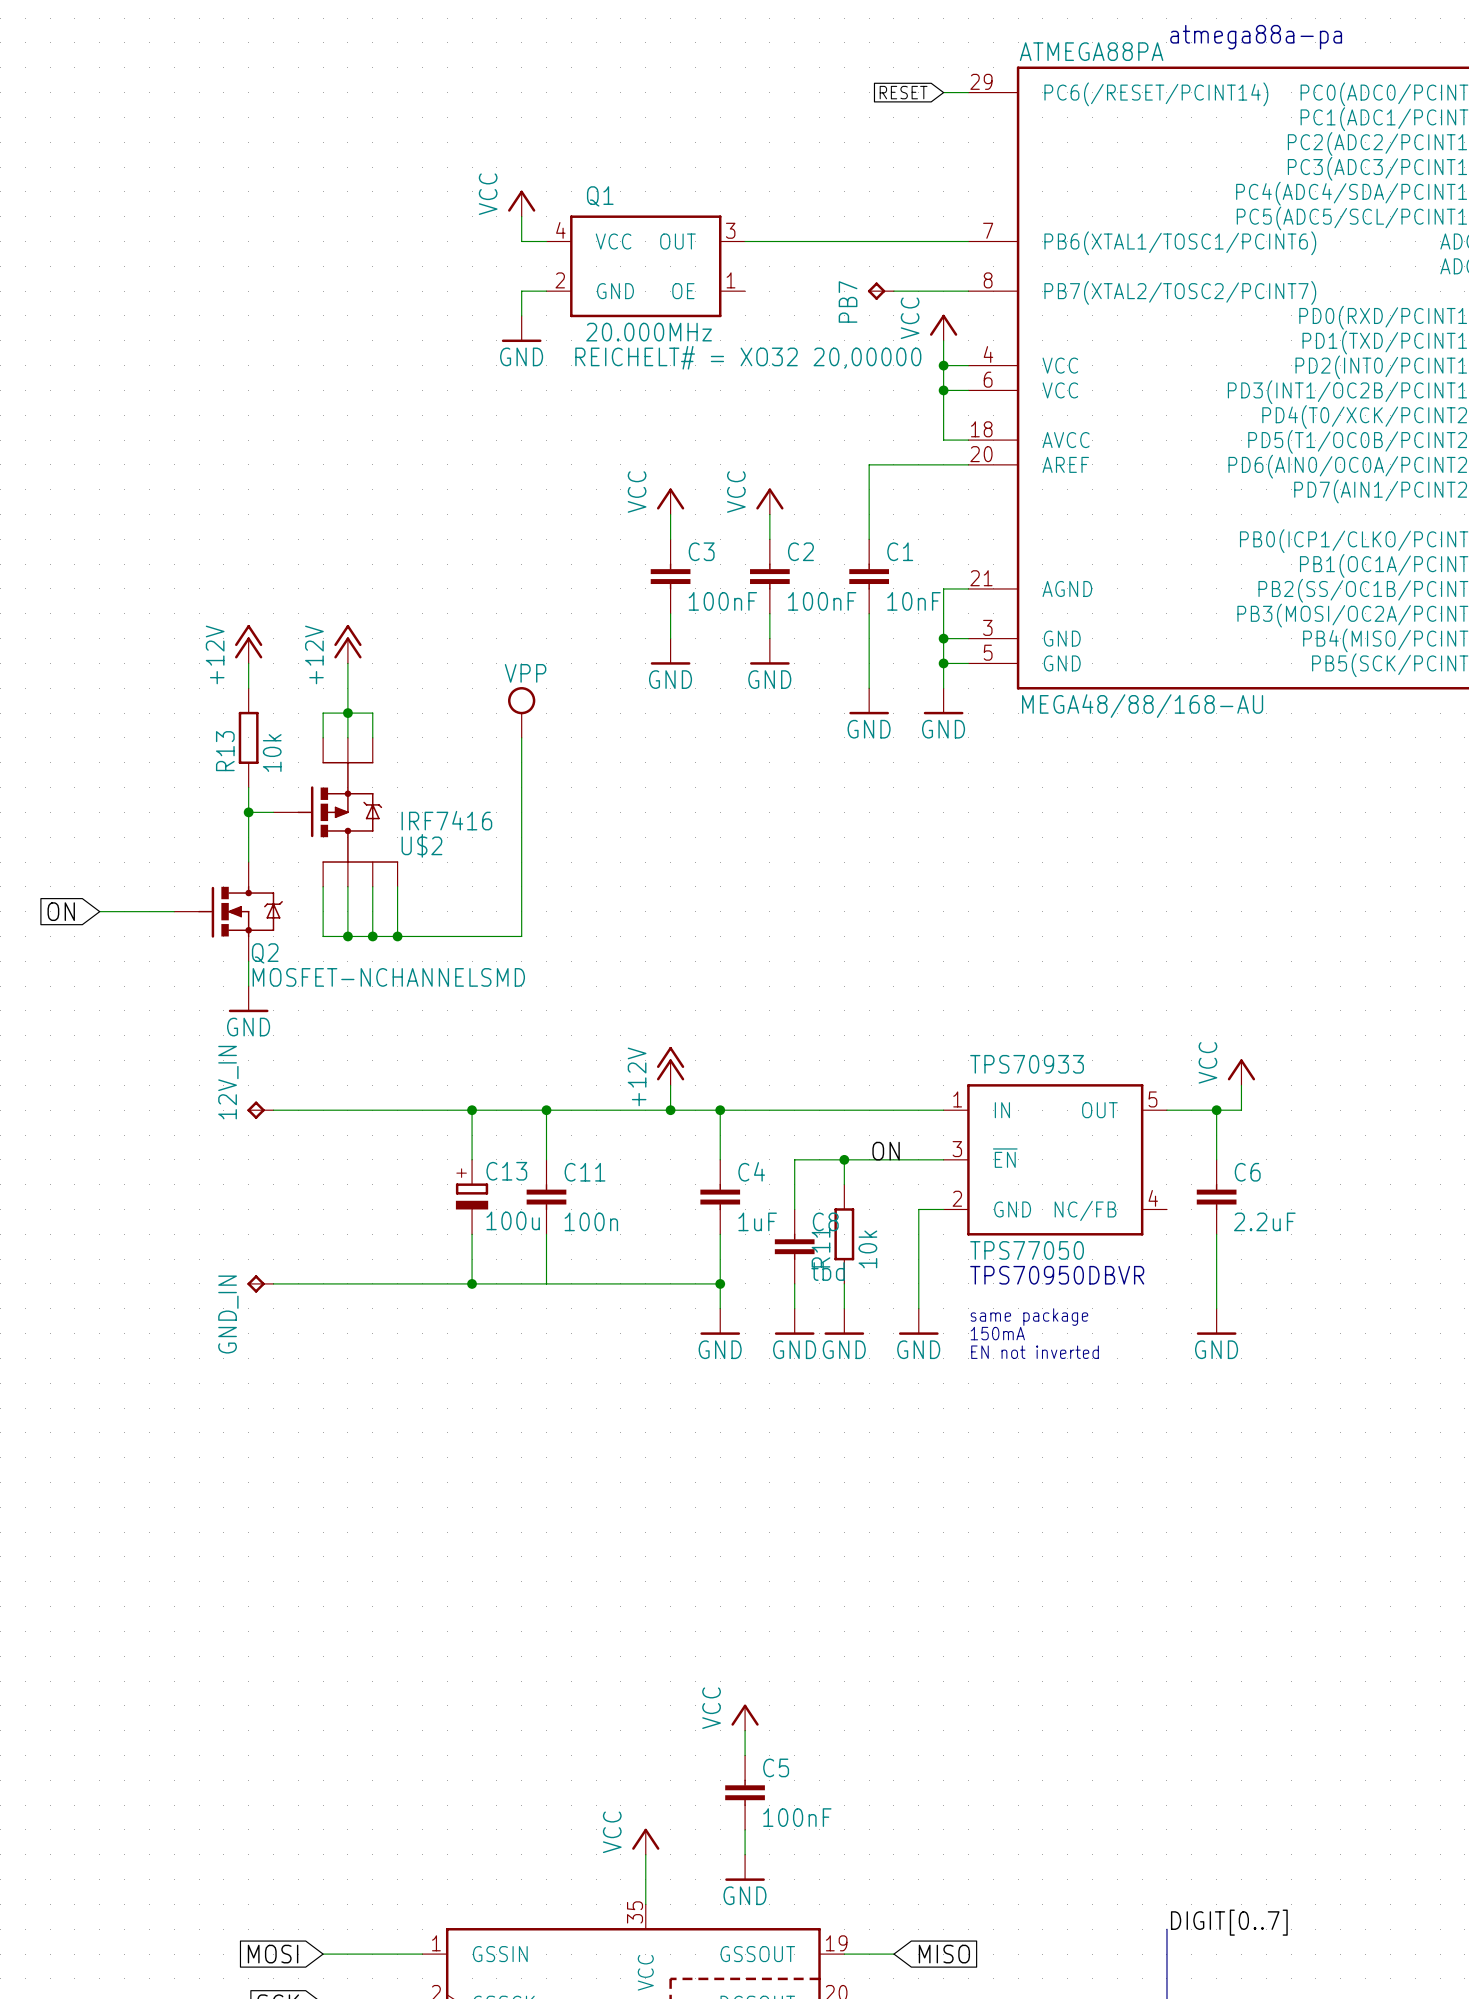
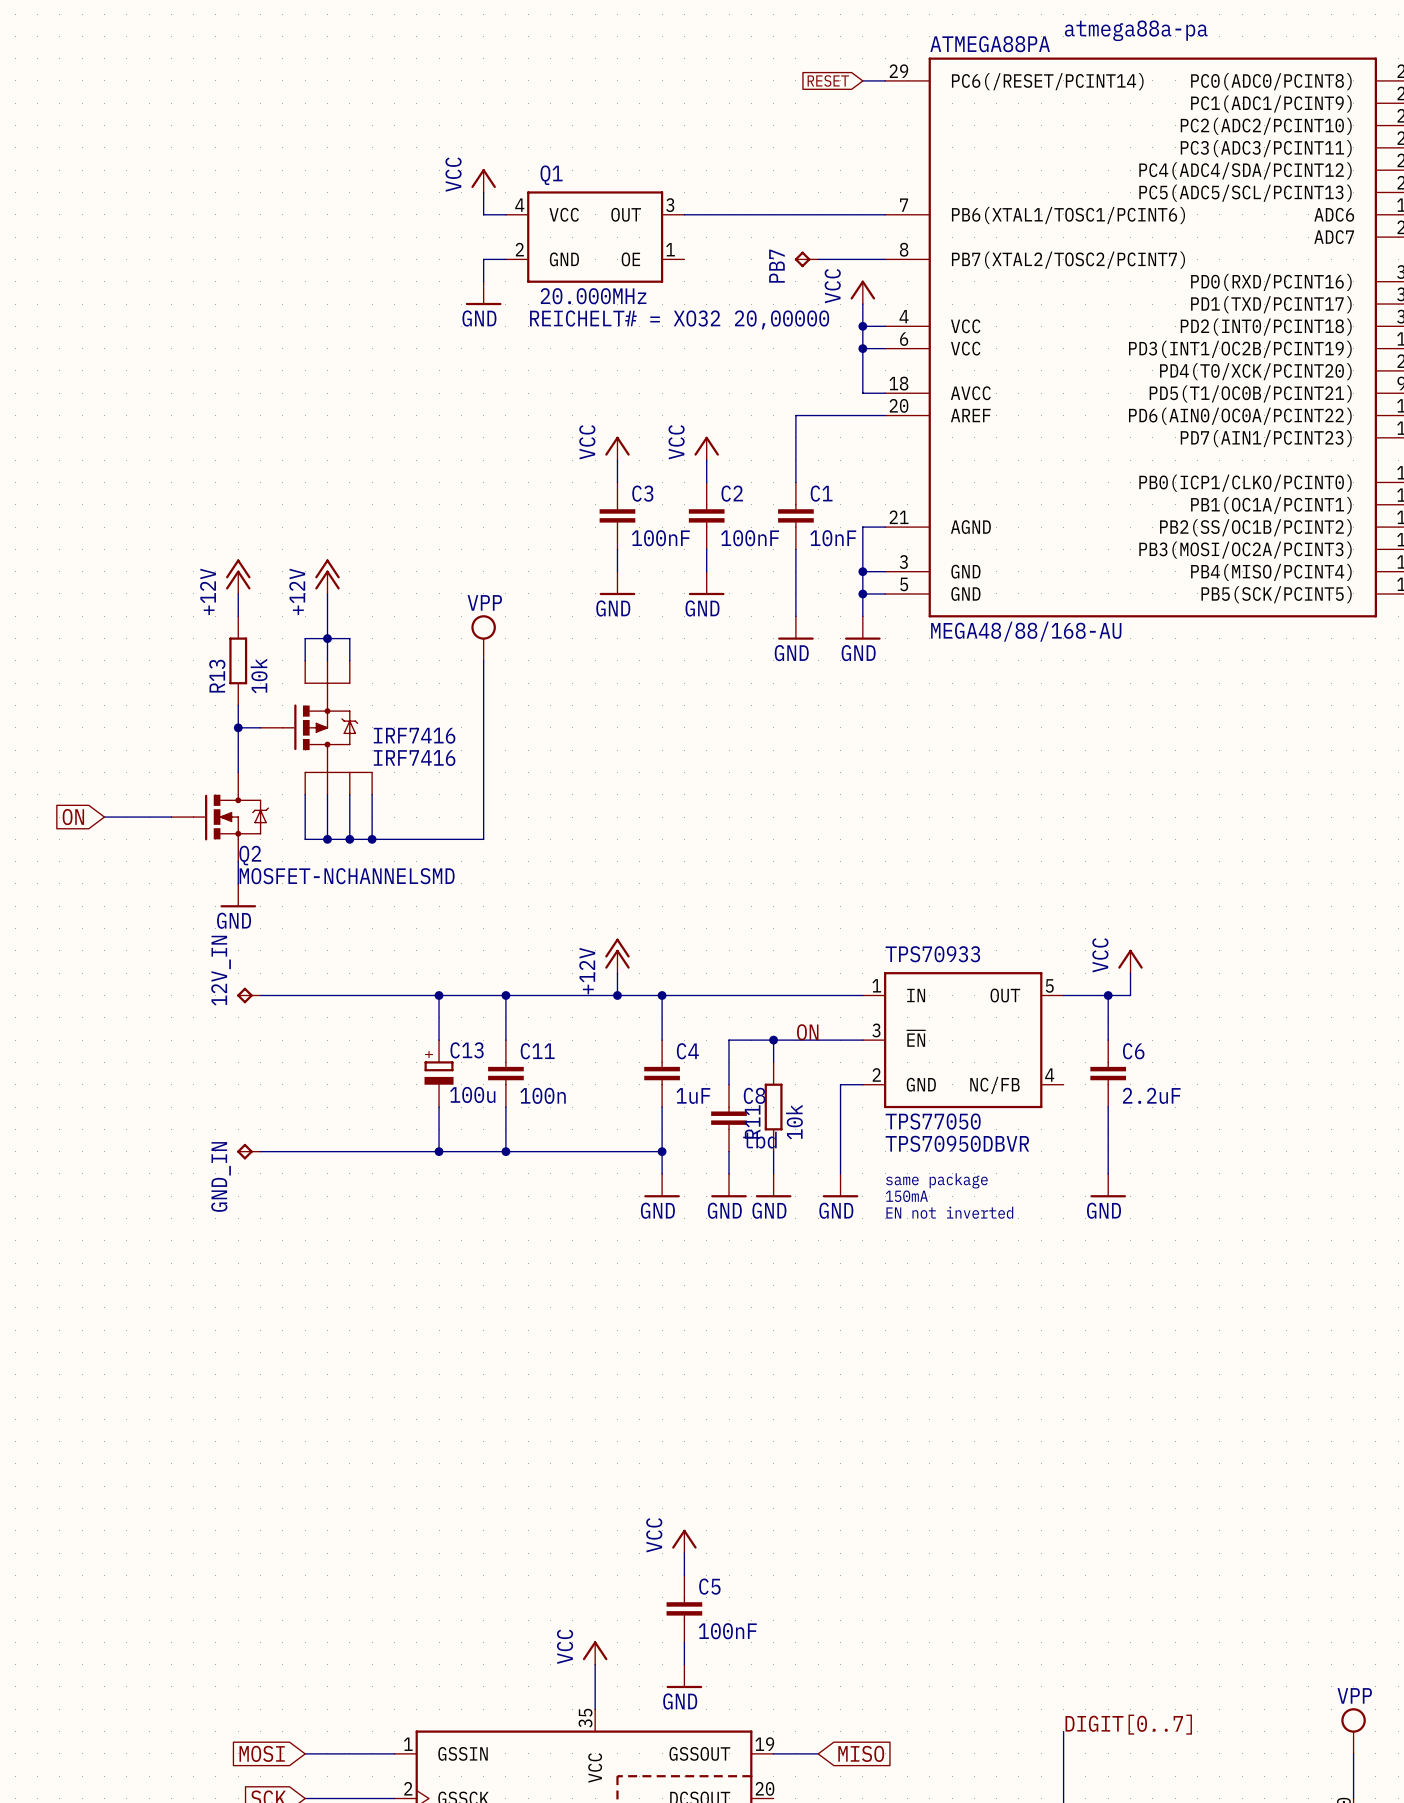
U$2 name: U$2 (421, 845) -> IRF7416 (414, 758)
junction: none -> (505, 1151)

